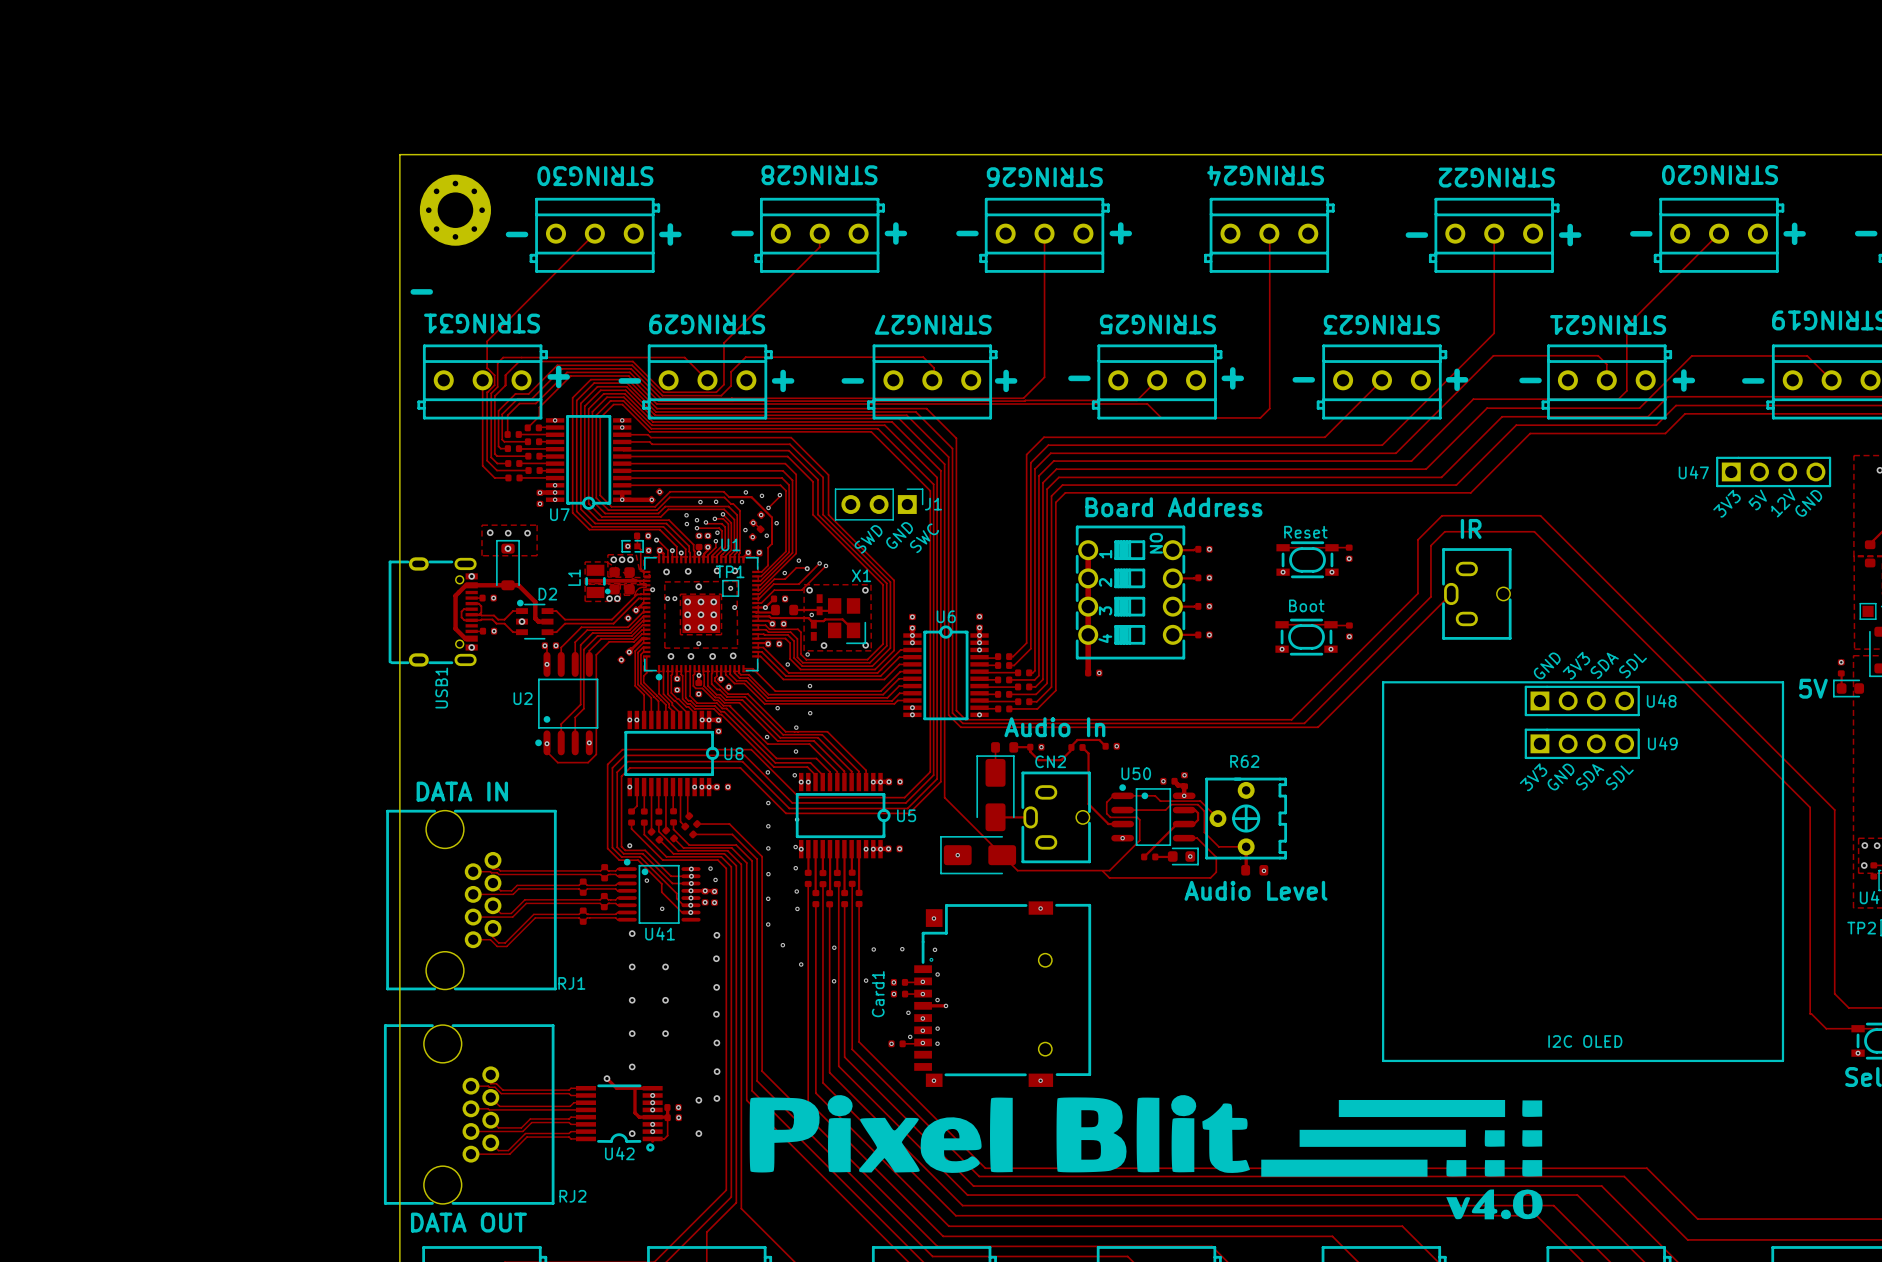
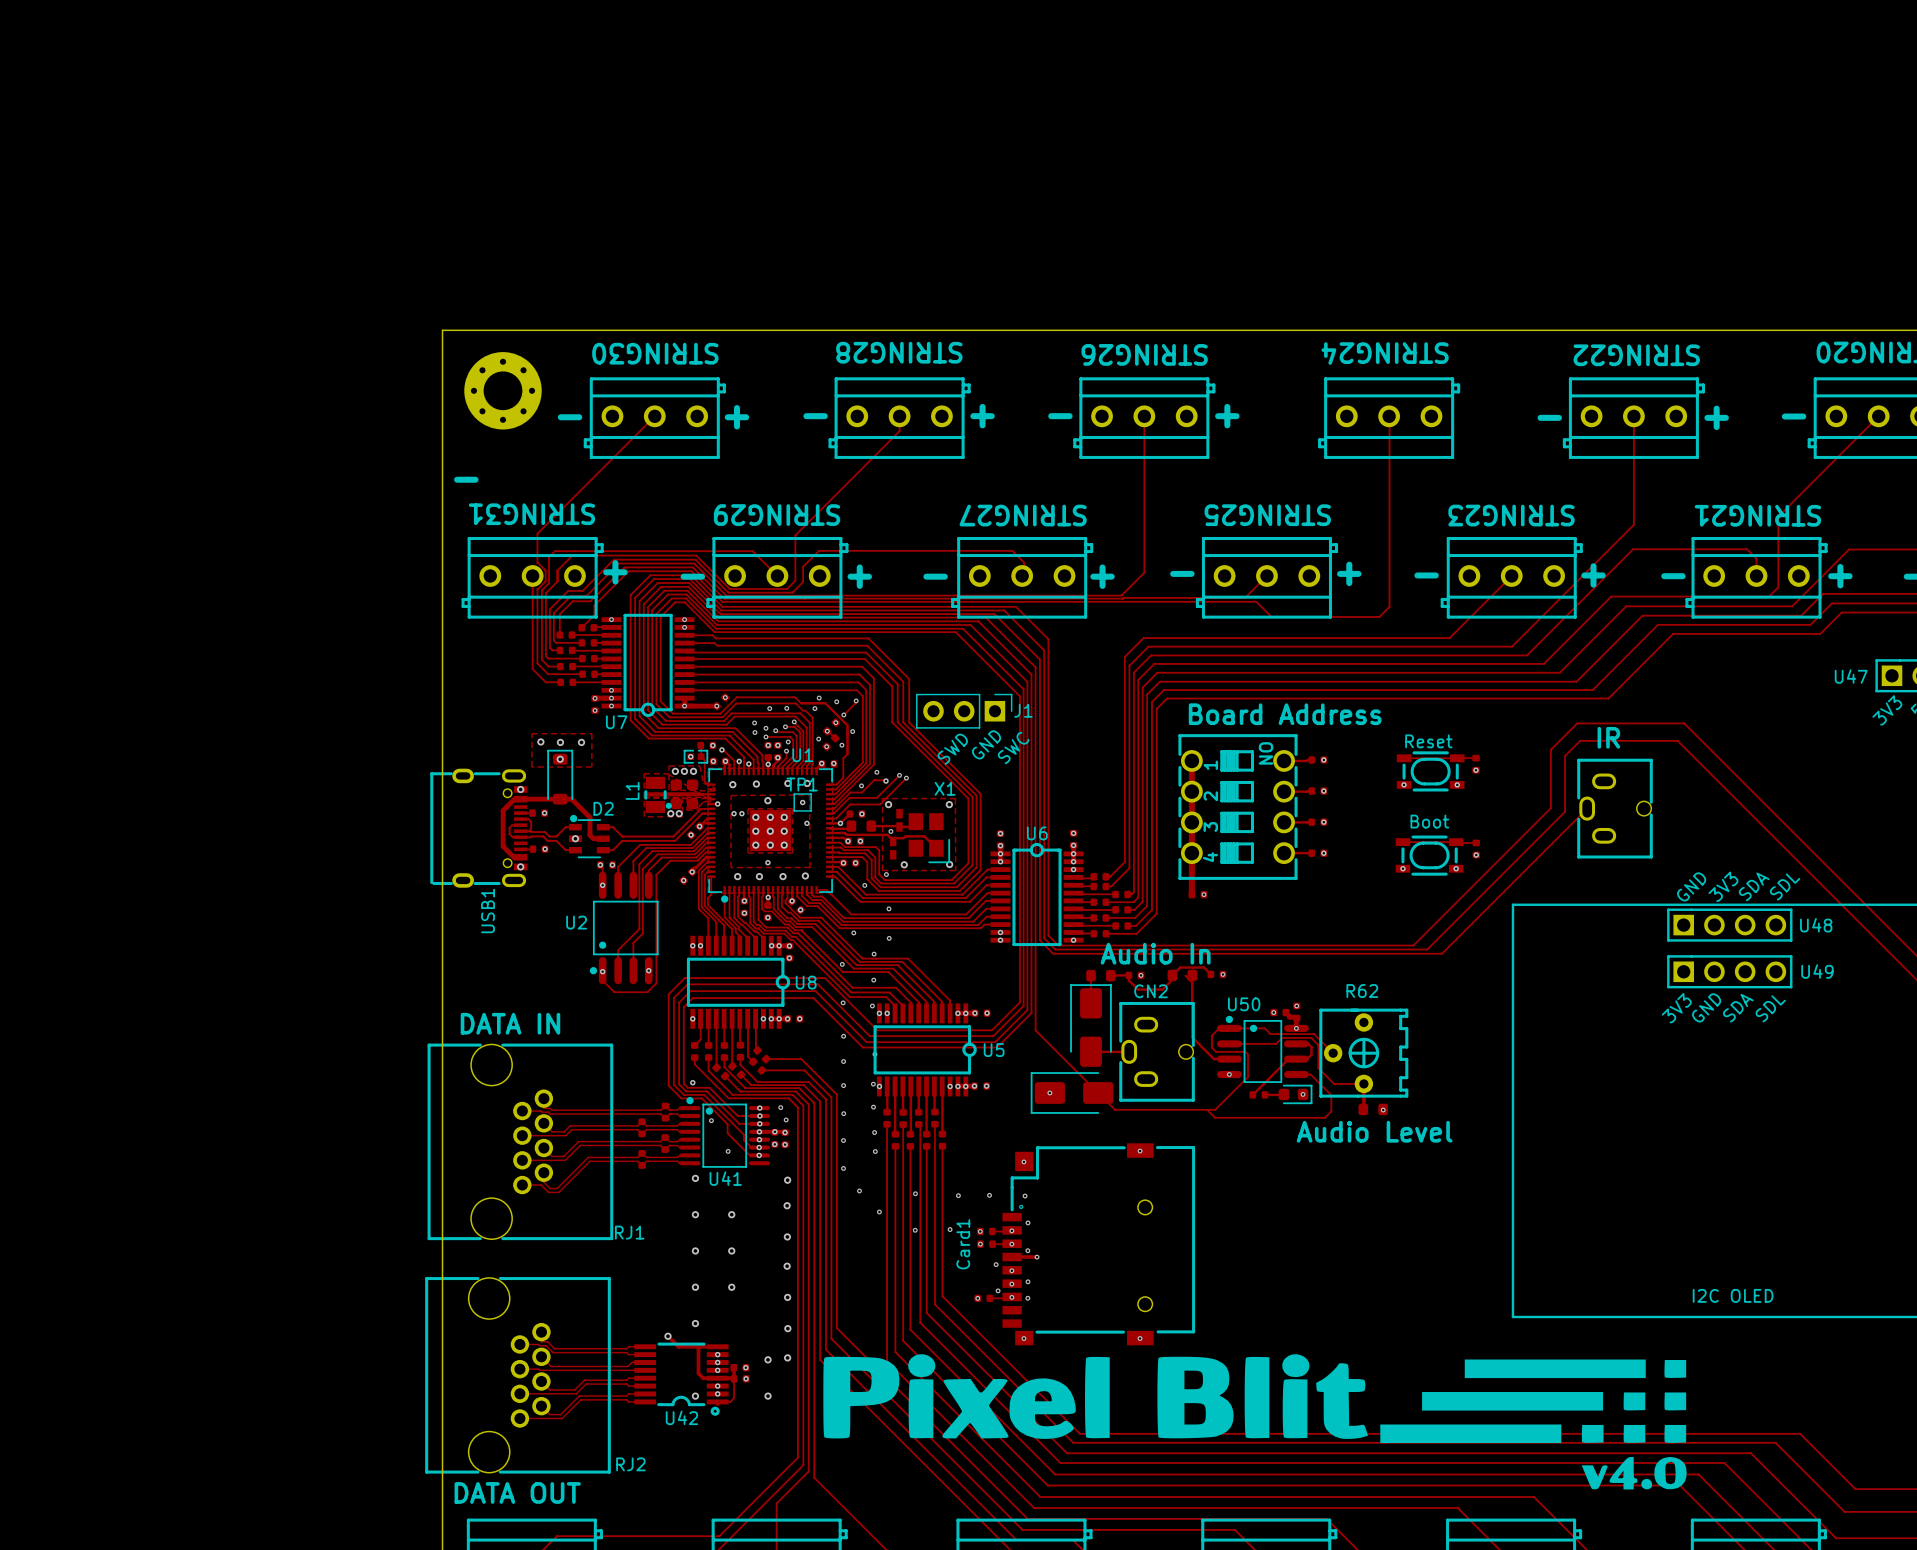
part footprint: [1068, 744, 1086, 751] -> [1167, 969, 1198, 982]

